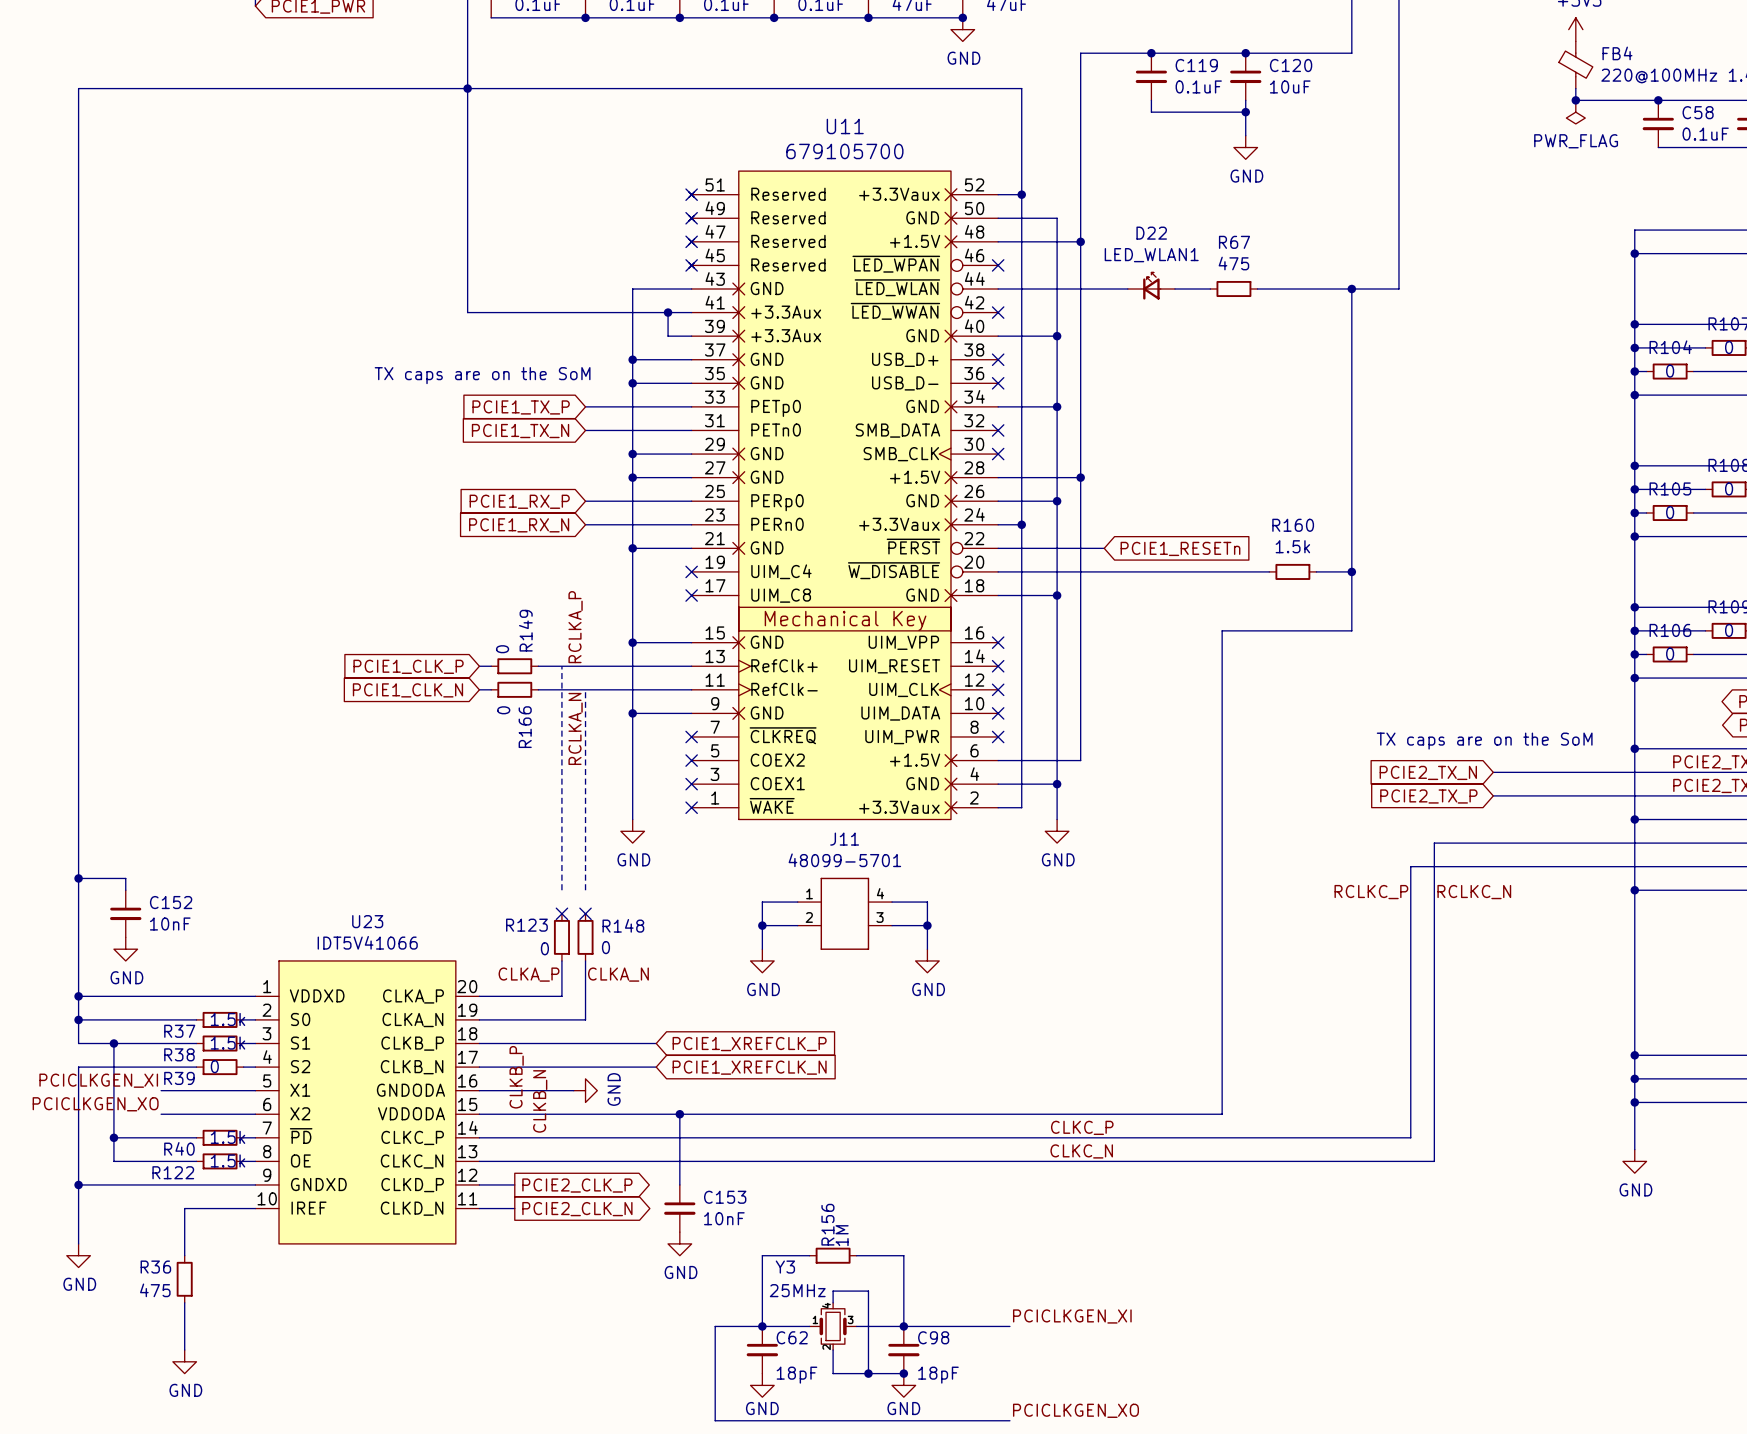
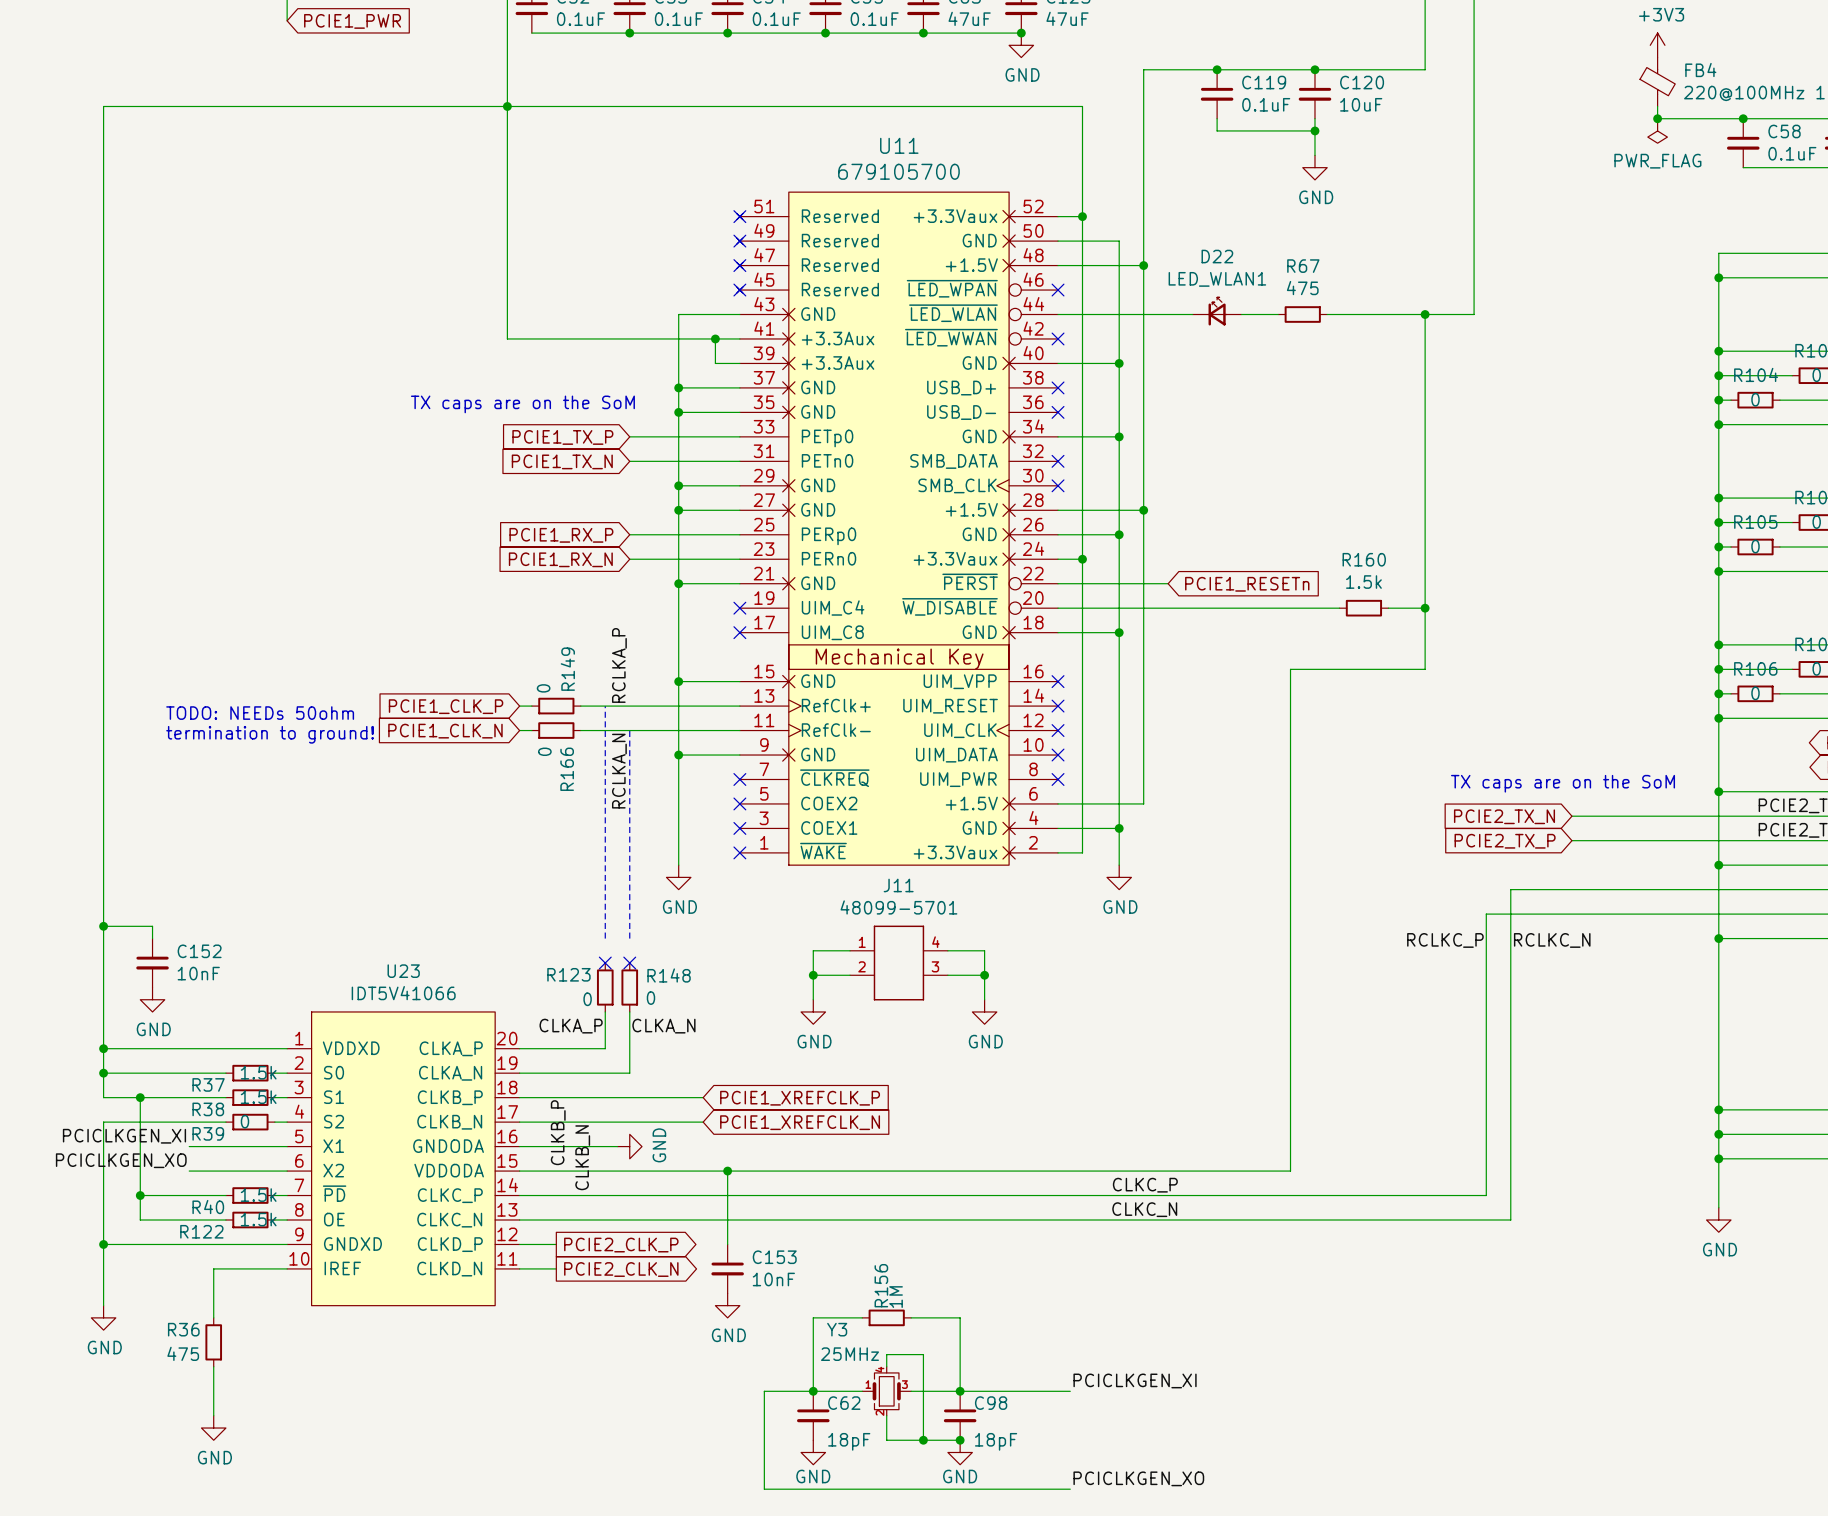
text: none -> TODO: NEEDs 50ohm (260, 713)
text: none -> termination to ground! (270, 734)

